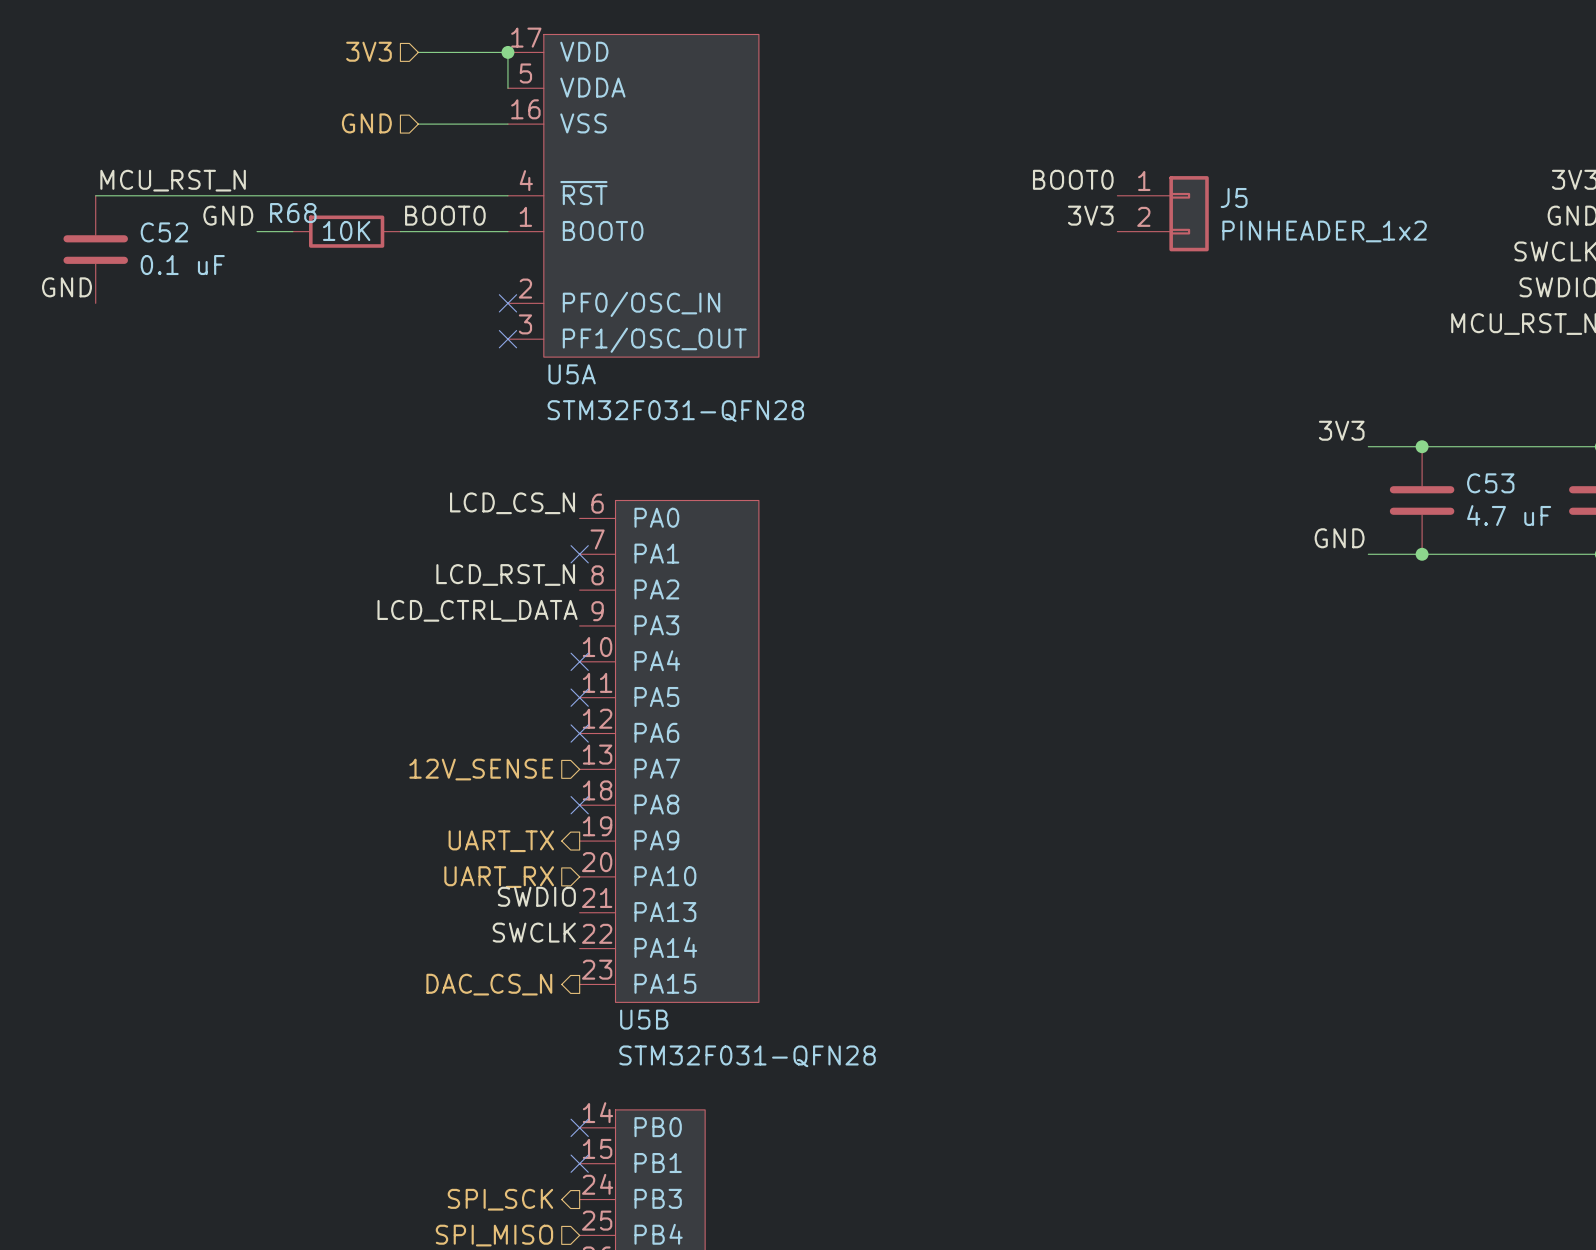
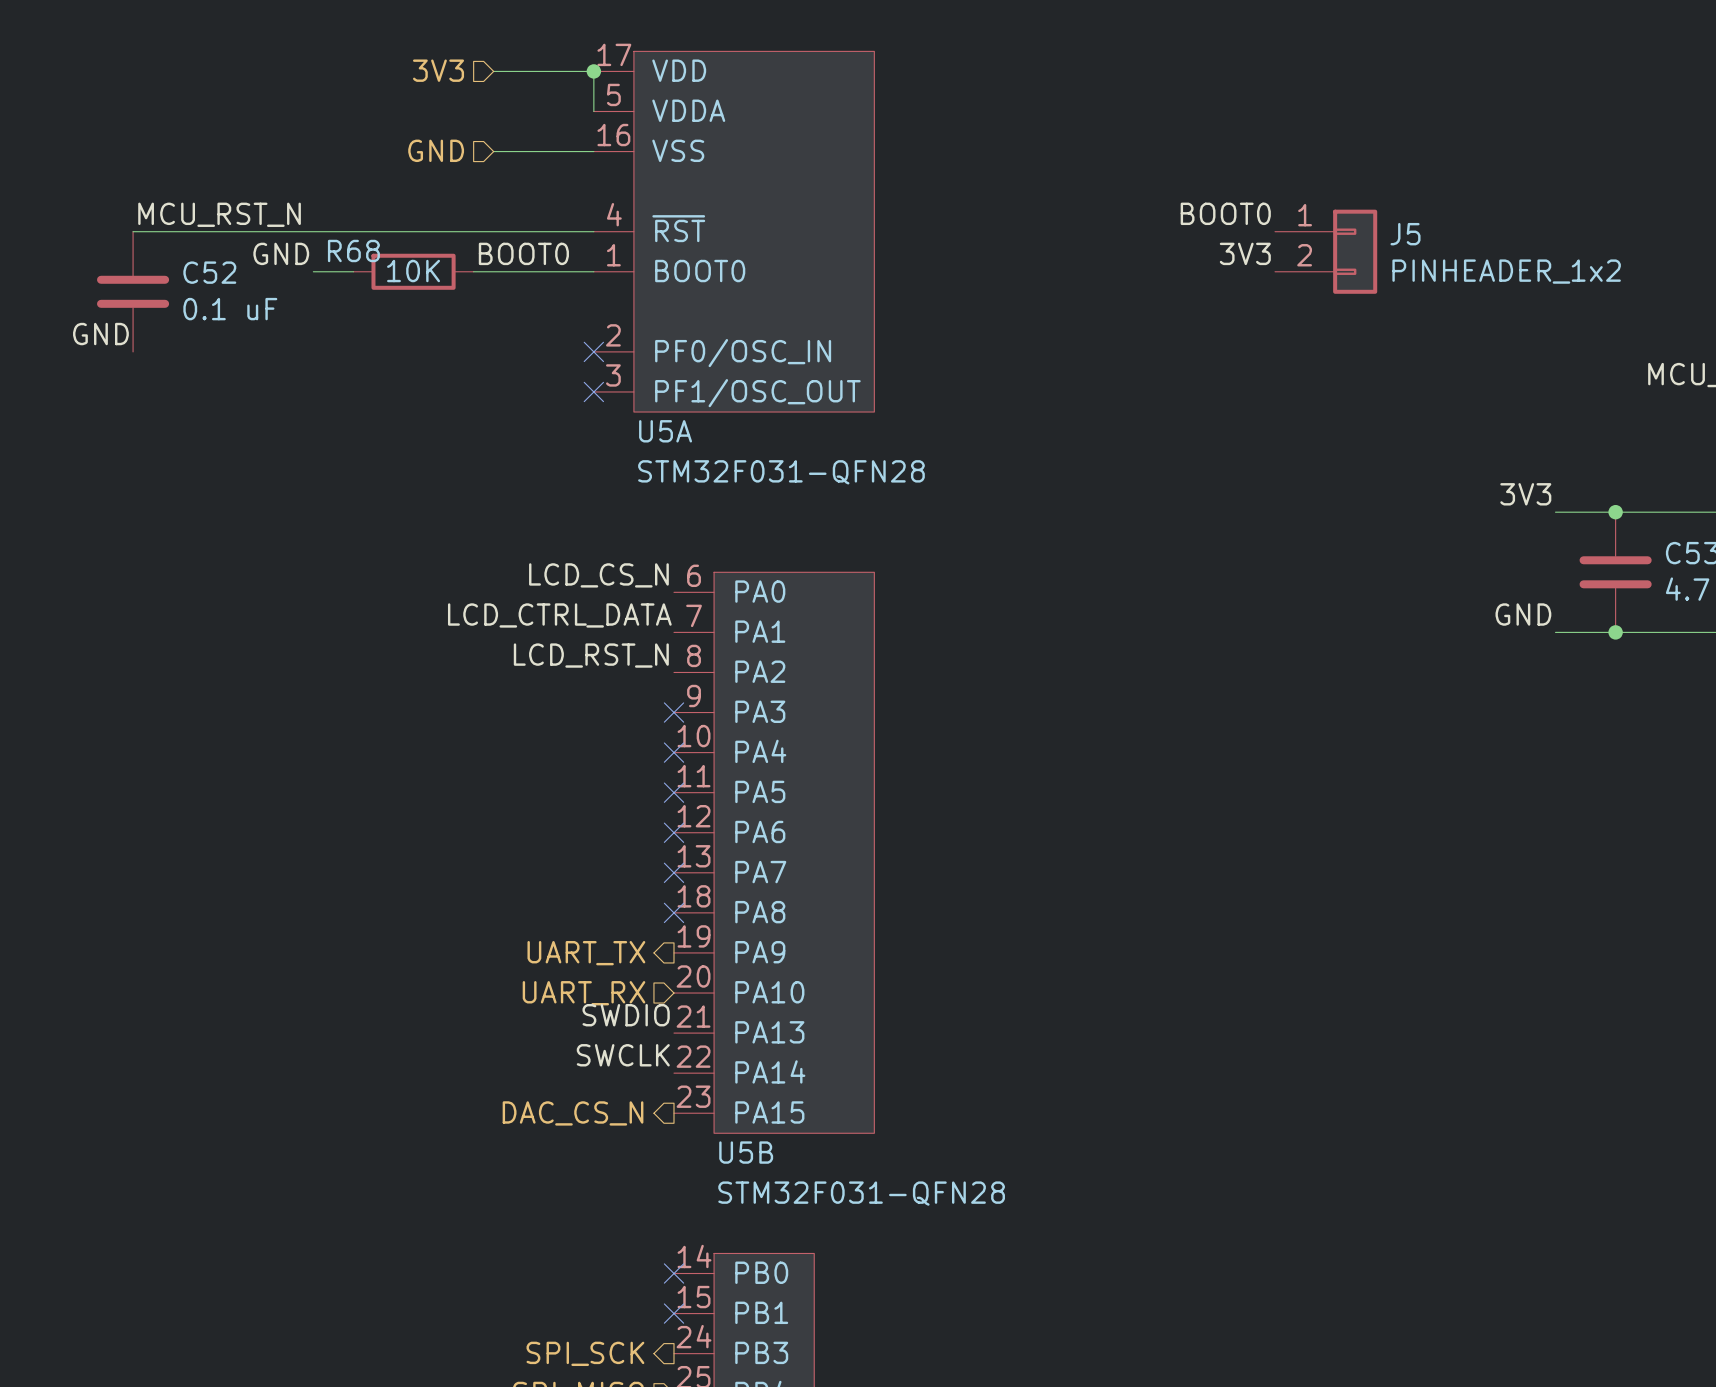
no-connect mark position: (579, 554) -> (673, 712)
label position: LCD_CTRL_DATA (477, 610) -> LCD_CTRL_DATA (559, 615)
hierarchical label: 12V_SENSE (481, 769) -> none
no-connect mark: none -> (673, 872)

